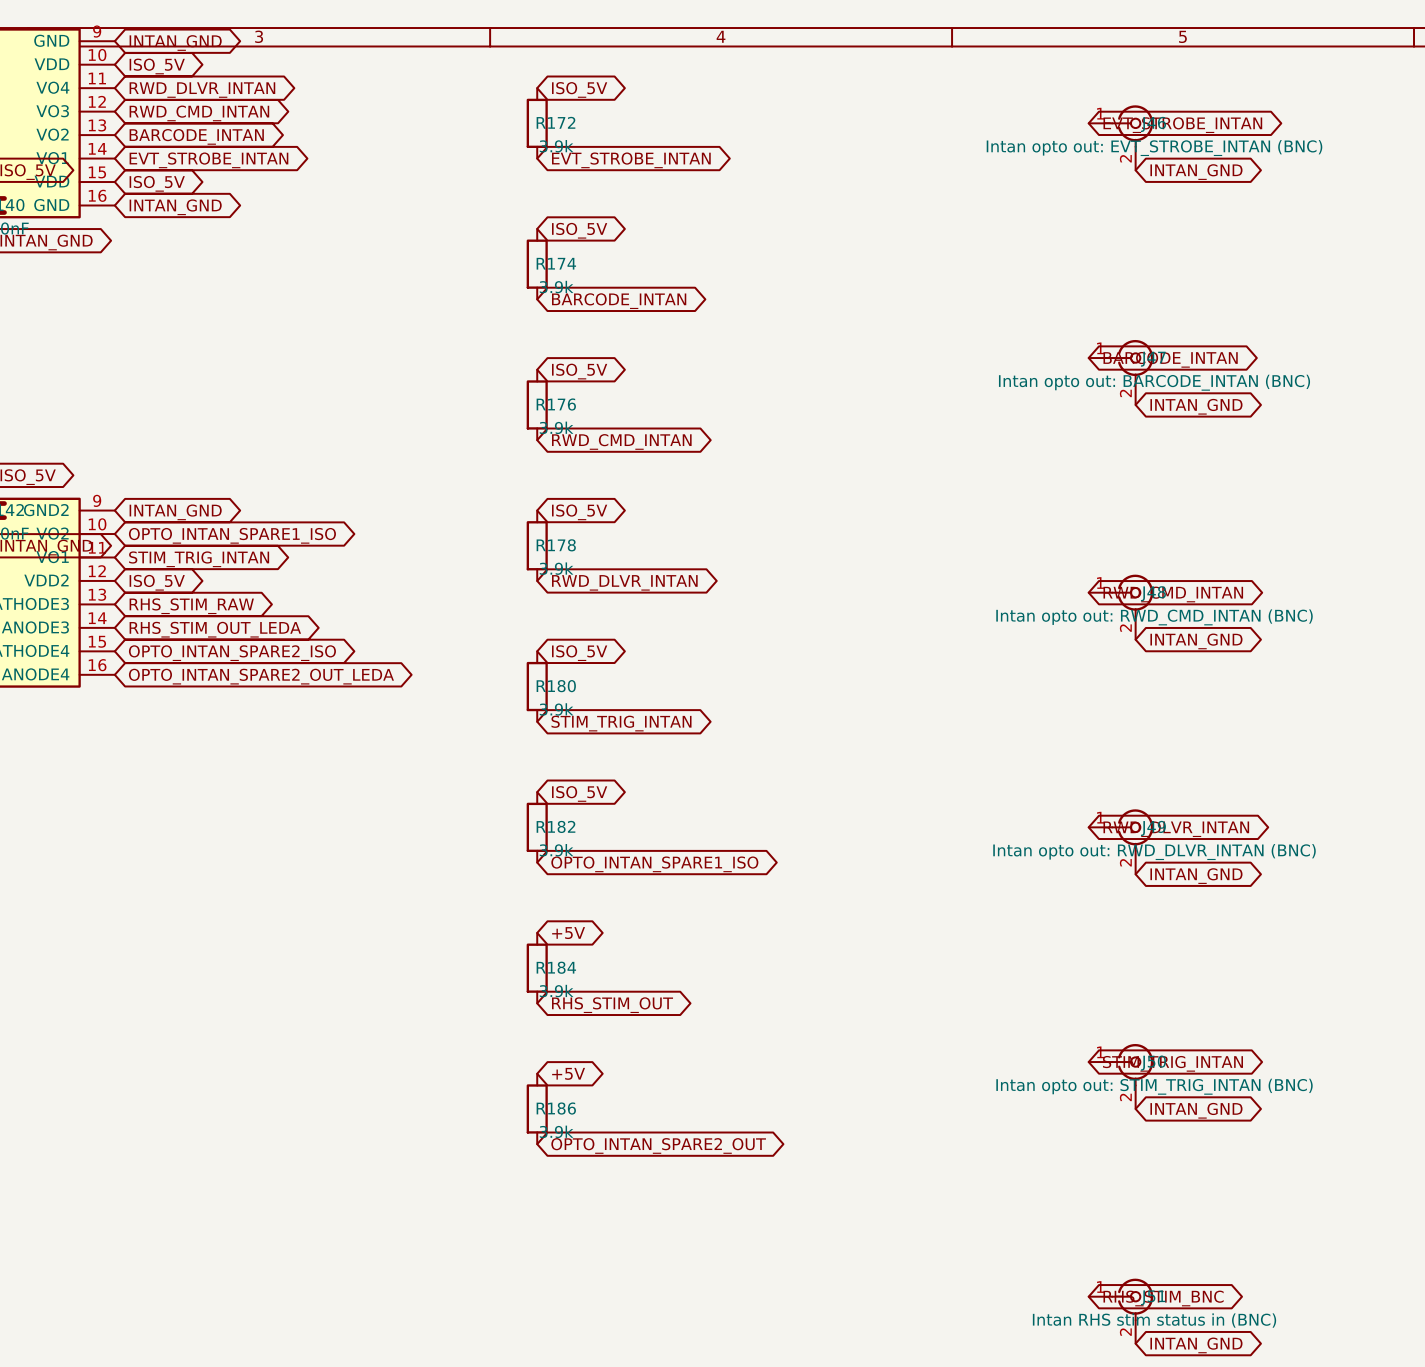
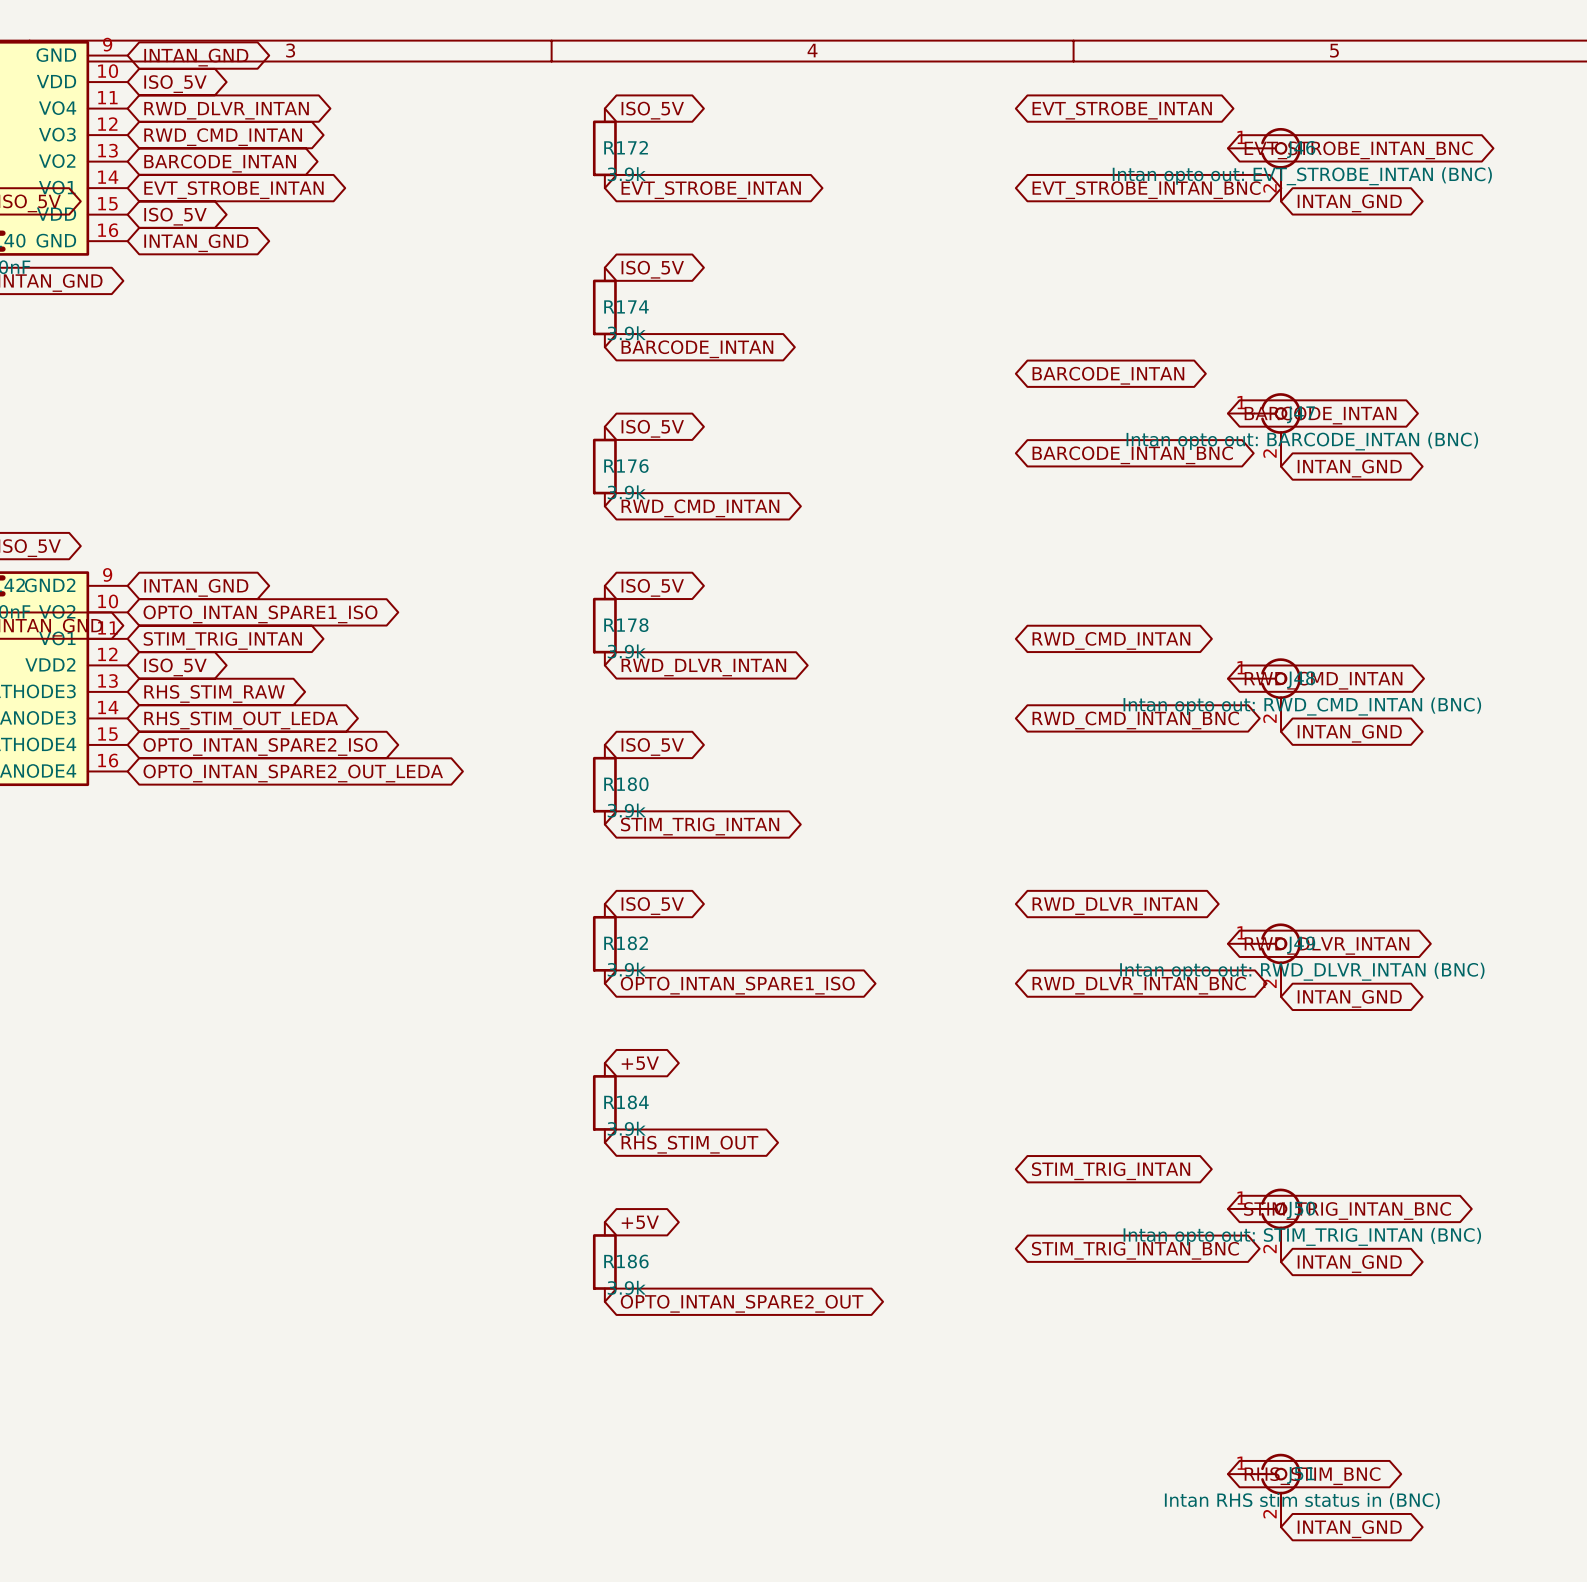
global label: none -> EVT_STROBE_INTAN (1122, 110)
global label: EVT_STROBE_INTAN (1182, 125) -> EVT_STROBE_INTAN_BNC (1358, 150)
global label: none -> EVT_STROBE_INTAN_BNC (1146, 190)
global label: none -> BARCODE_INTAN (1108, 375)
global label: none -> BARCODE_INTAN_BNC (1132, 455)
global label: none -> RWD_CMD_INTAN (1111, 640)
global label: none -> RWD_CMD_INTAN_BNC (1135, 720)
global label: none -> RWD_DLVR_INTAN (1114, 906)
global label: none -> RWD_DLVR_INTAN_BNC (1139, 985)
global label: none -> STIM_TRIG_INTAN (1111, 1171)
global label: STIM_TRIG_INTAN (1172, 1063) -> STIM_TRIG_INTAN_BNC (1347, 1210)
global label: none -> STIM_TRIG_INTAN_BNC (1135, 1250)

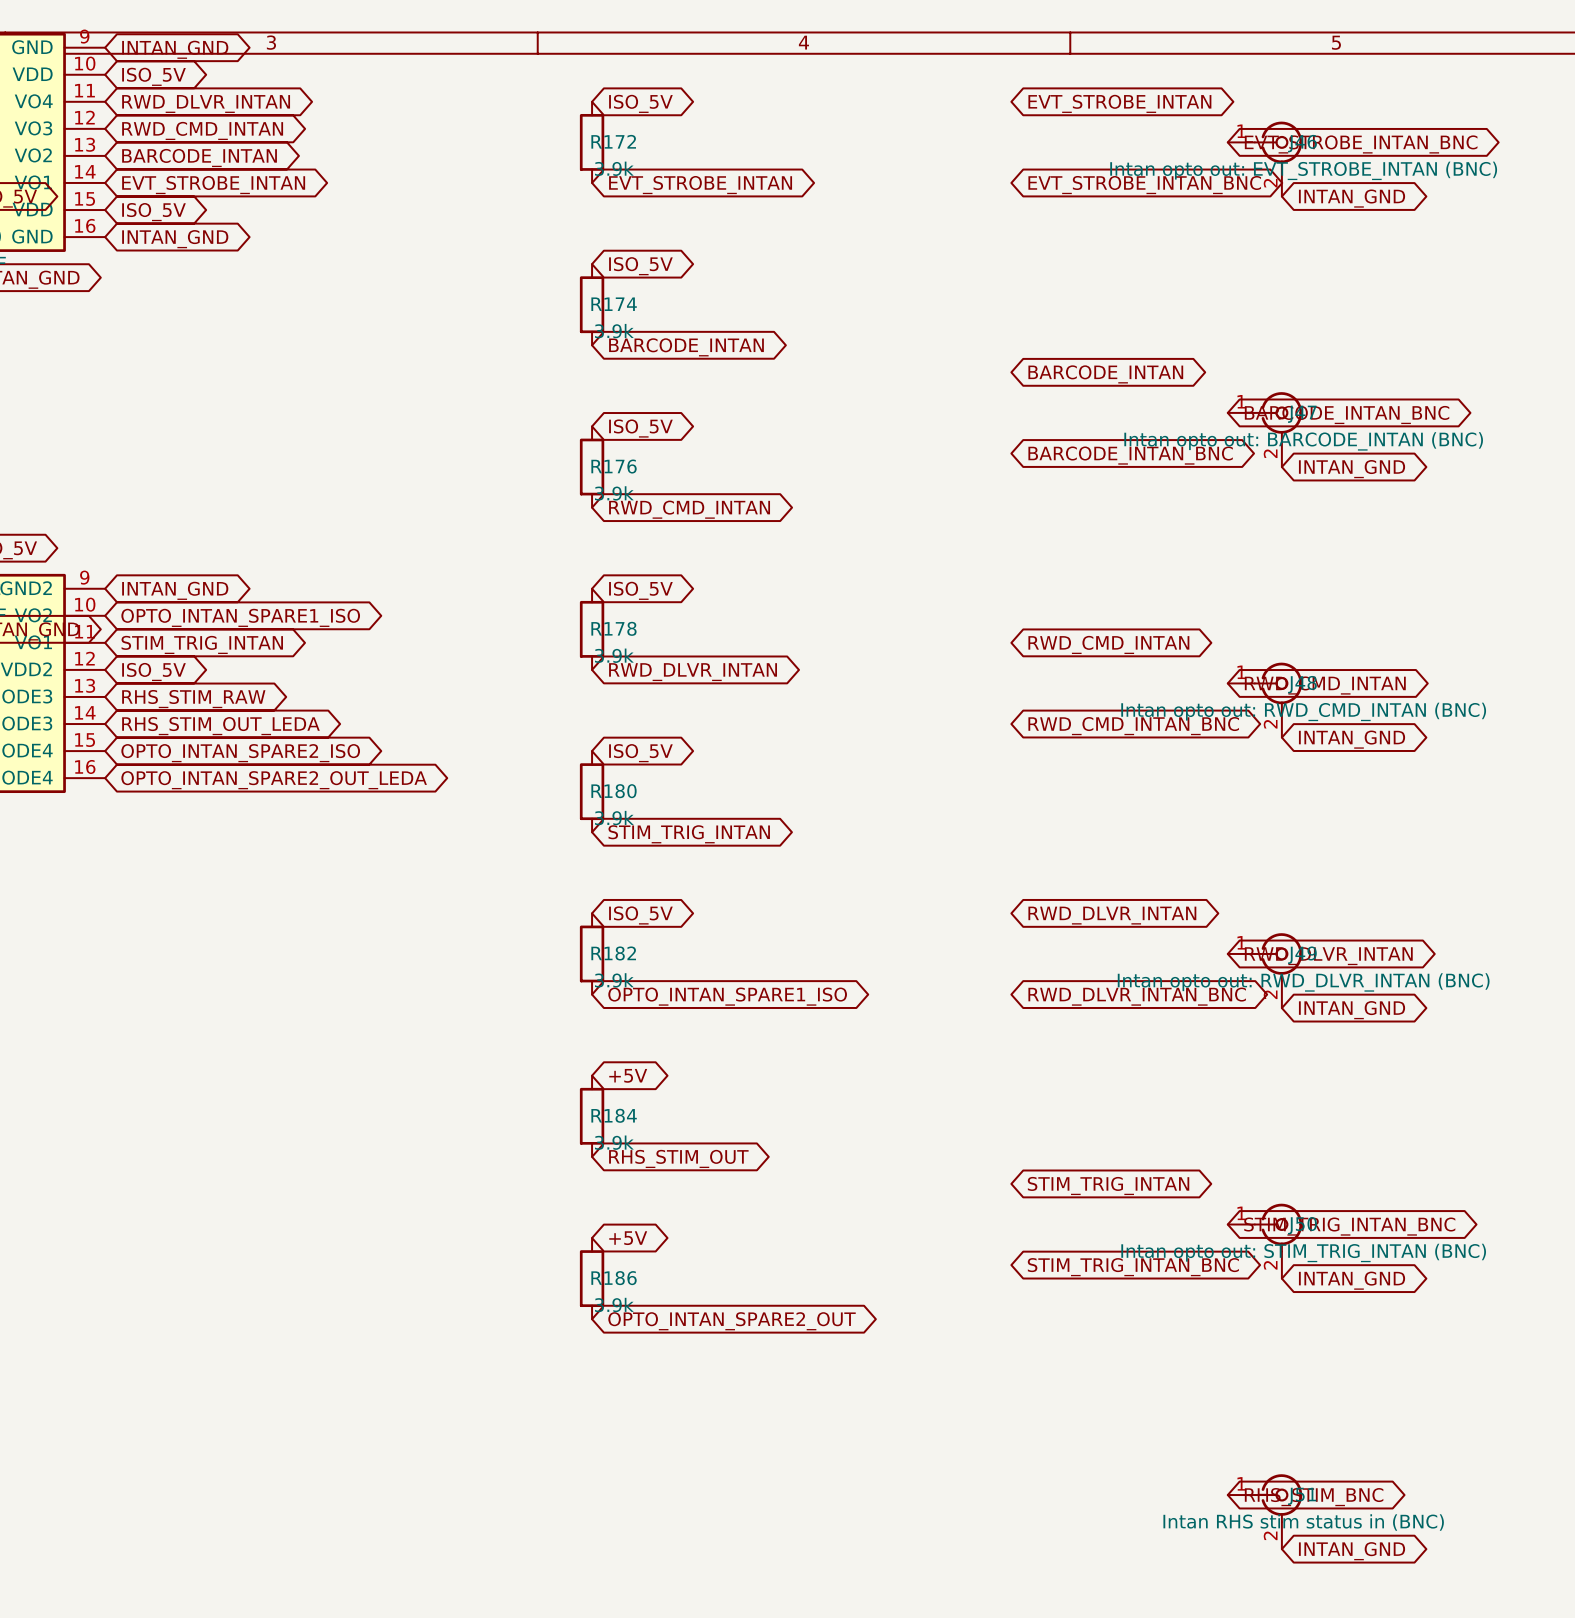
global label: BARCODE_INTAN (1320, 415) -> BARCODE_INTAN_BNC (1347, 414)

